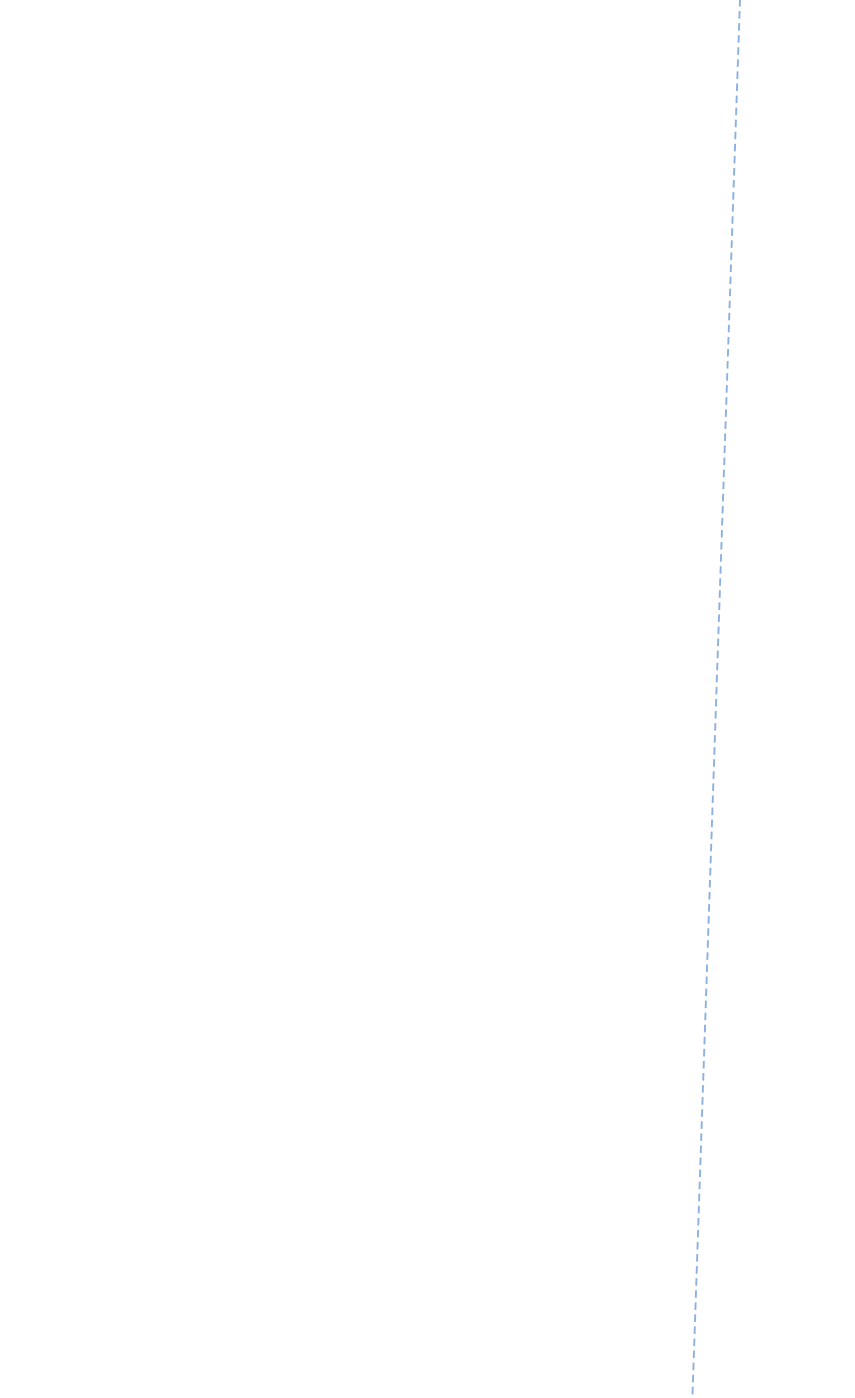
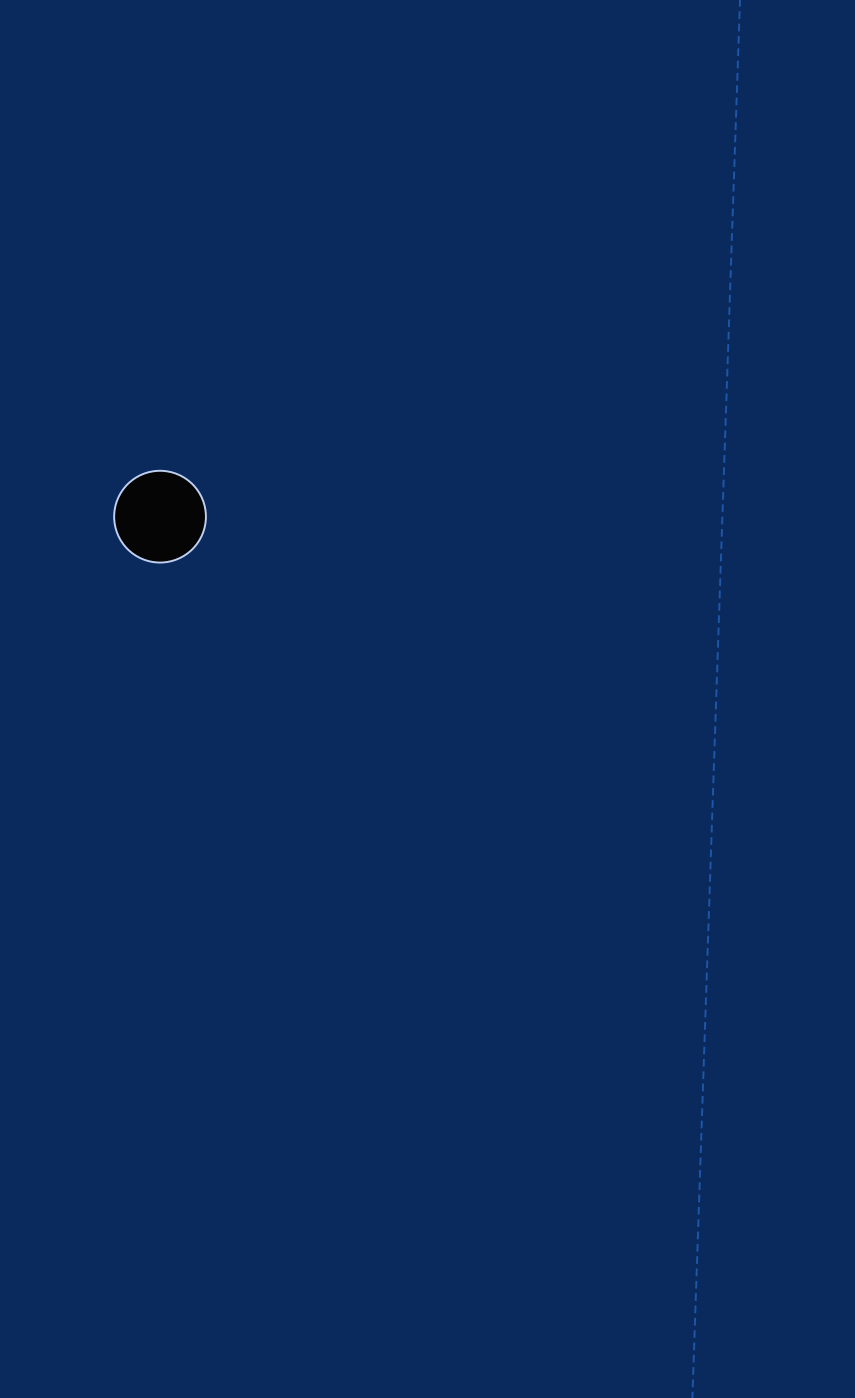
part: none -> (160, 516)

